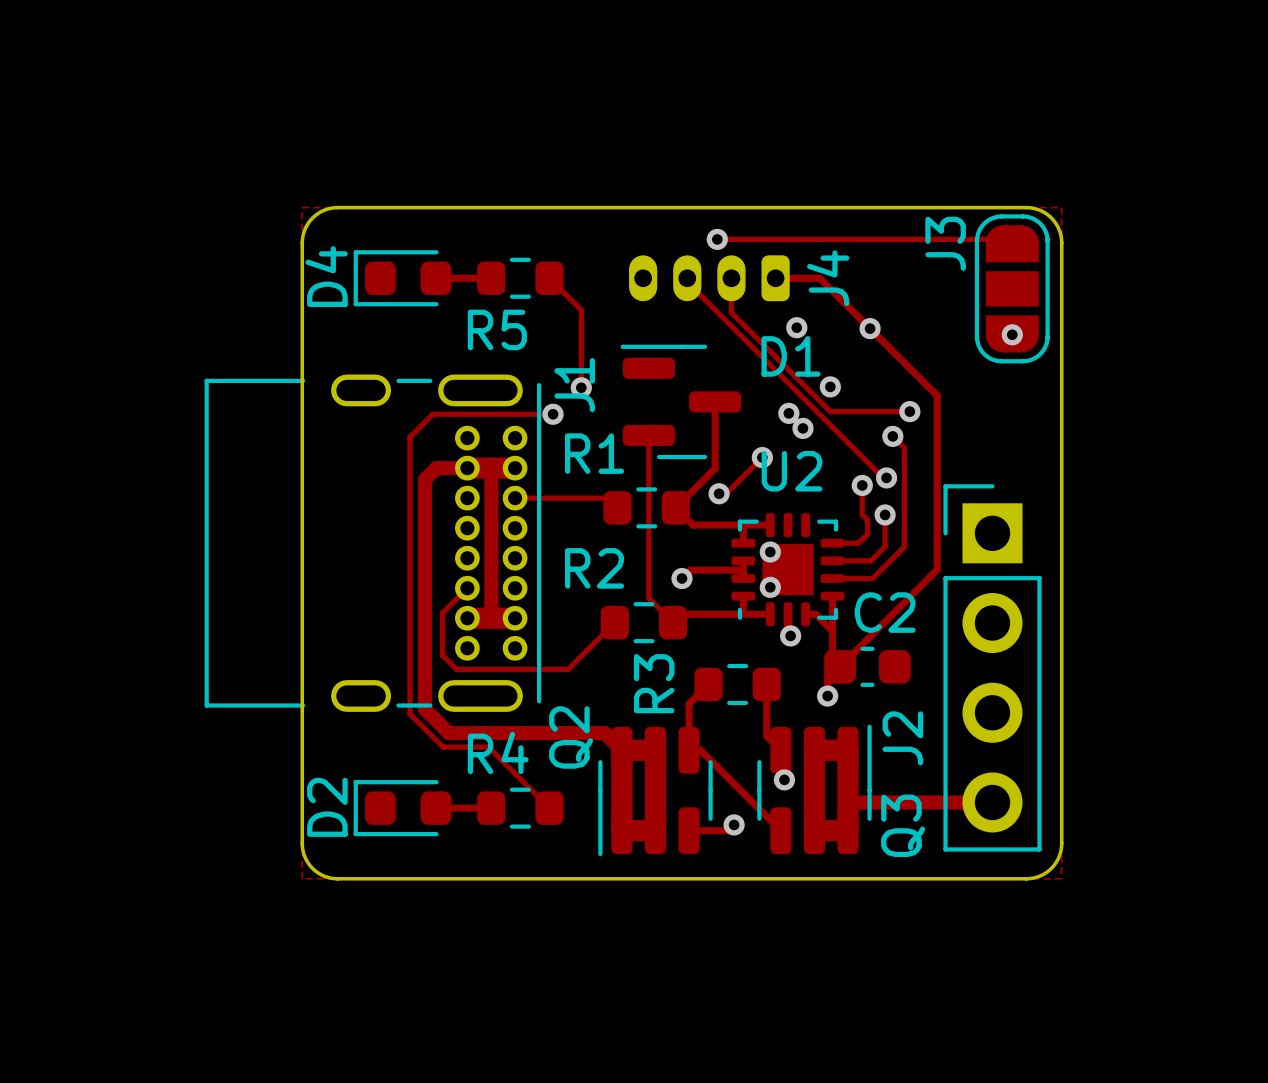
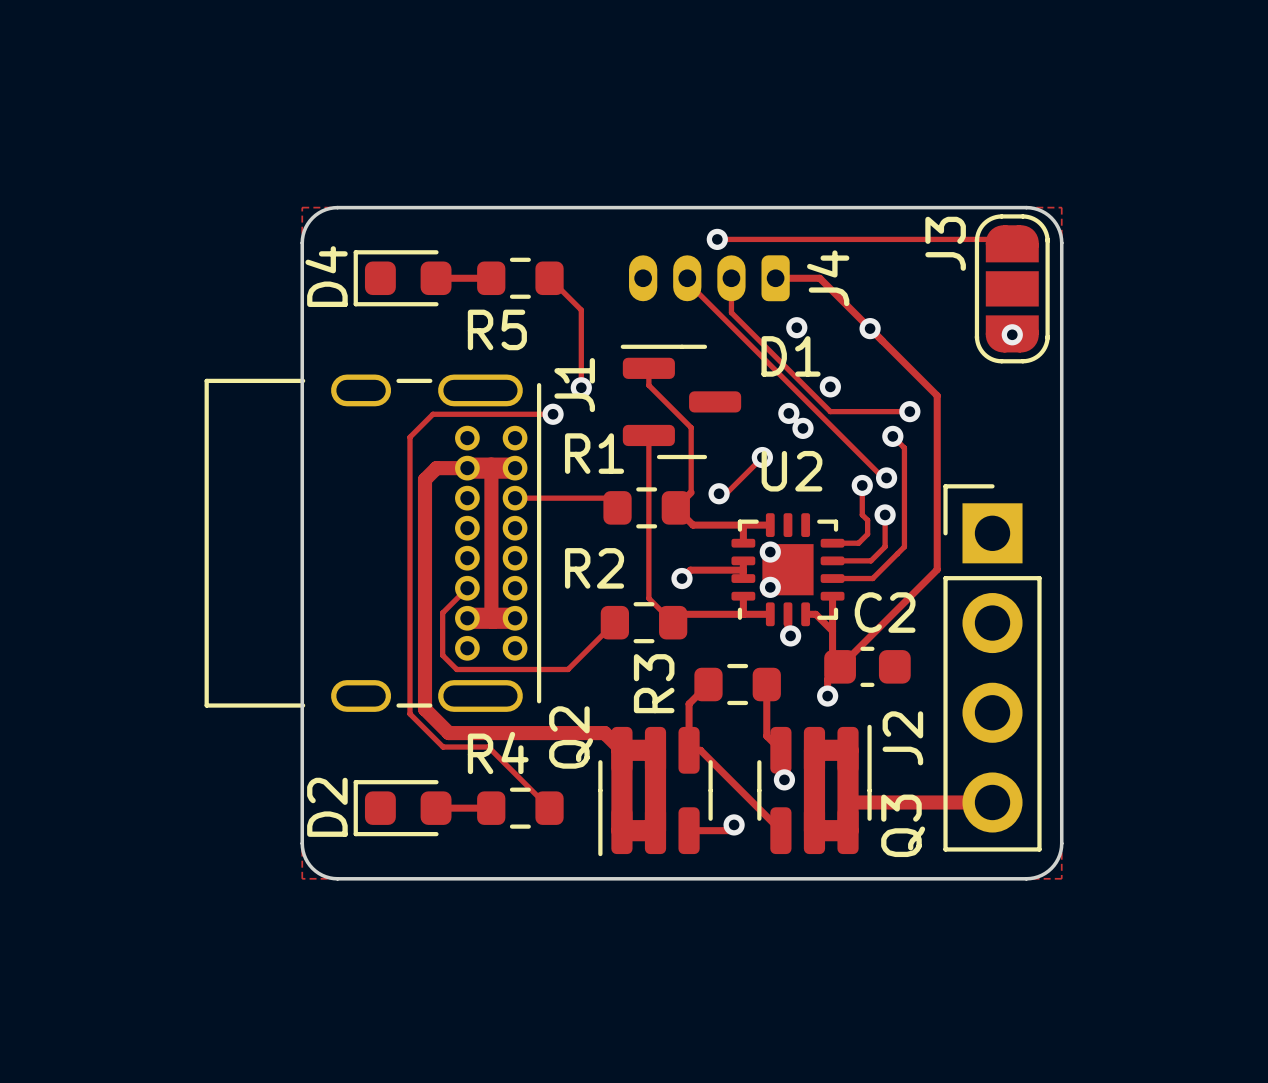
track: (715, 401) (715, 468) (691, 492) -> (648, 368) (648, 385) (691, 427) (691, 492)

